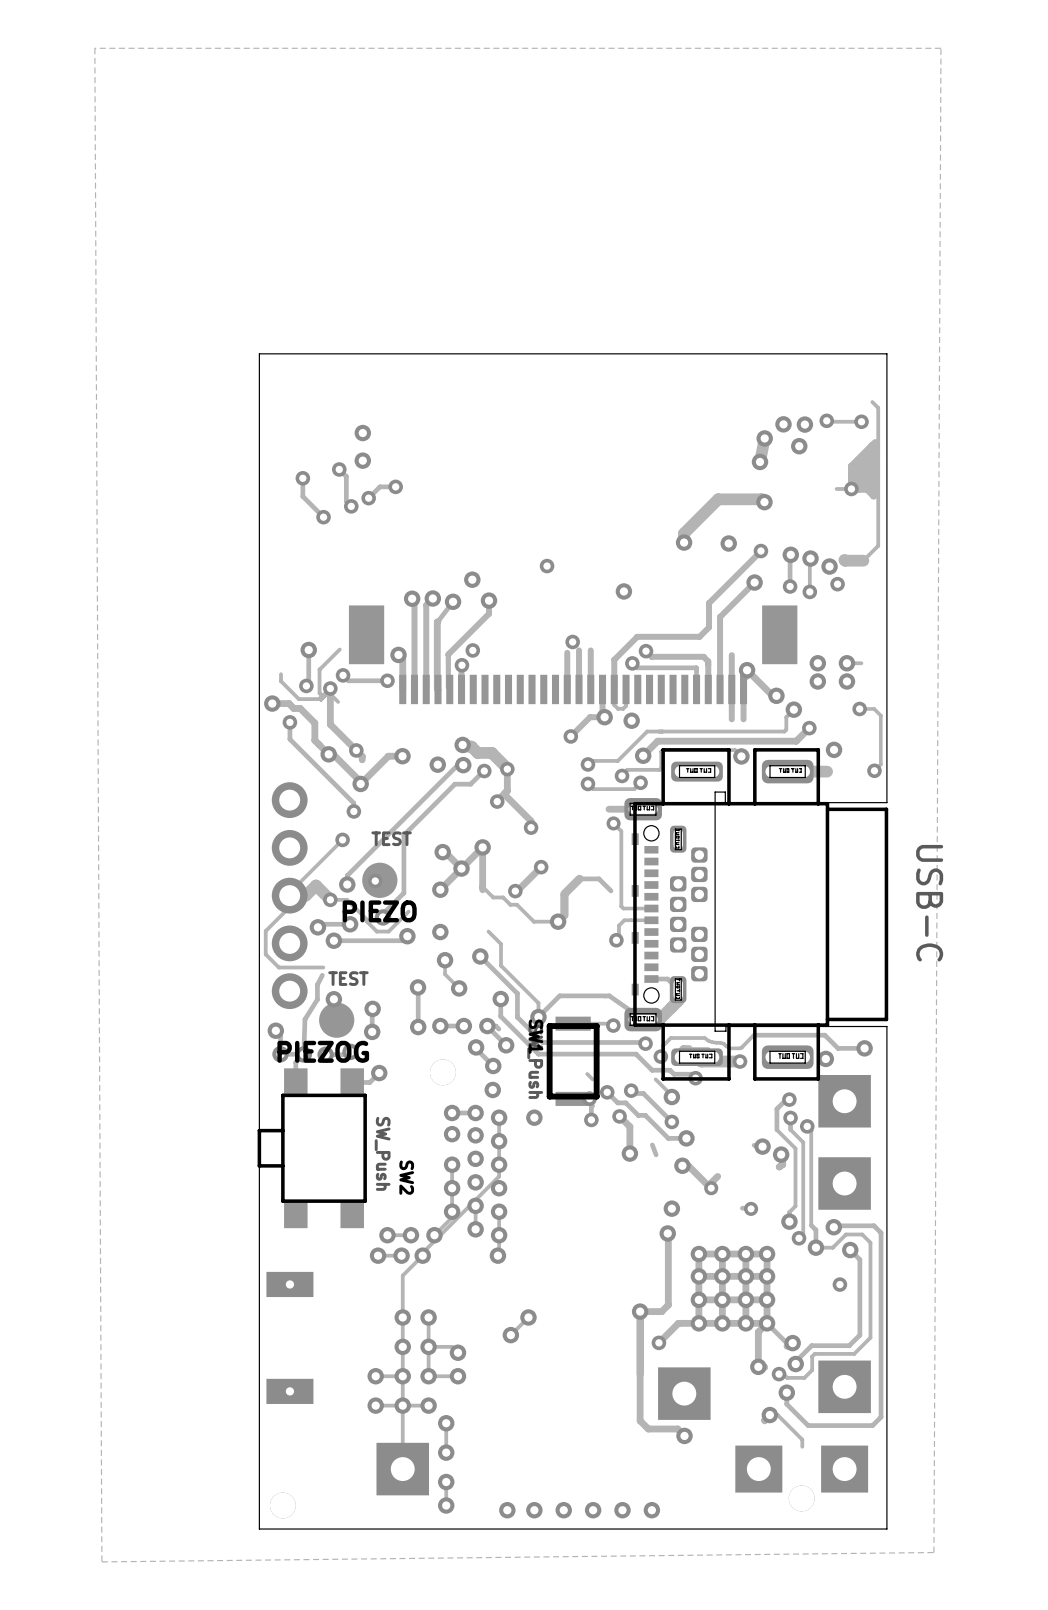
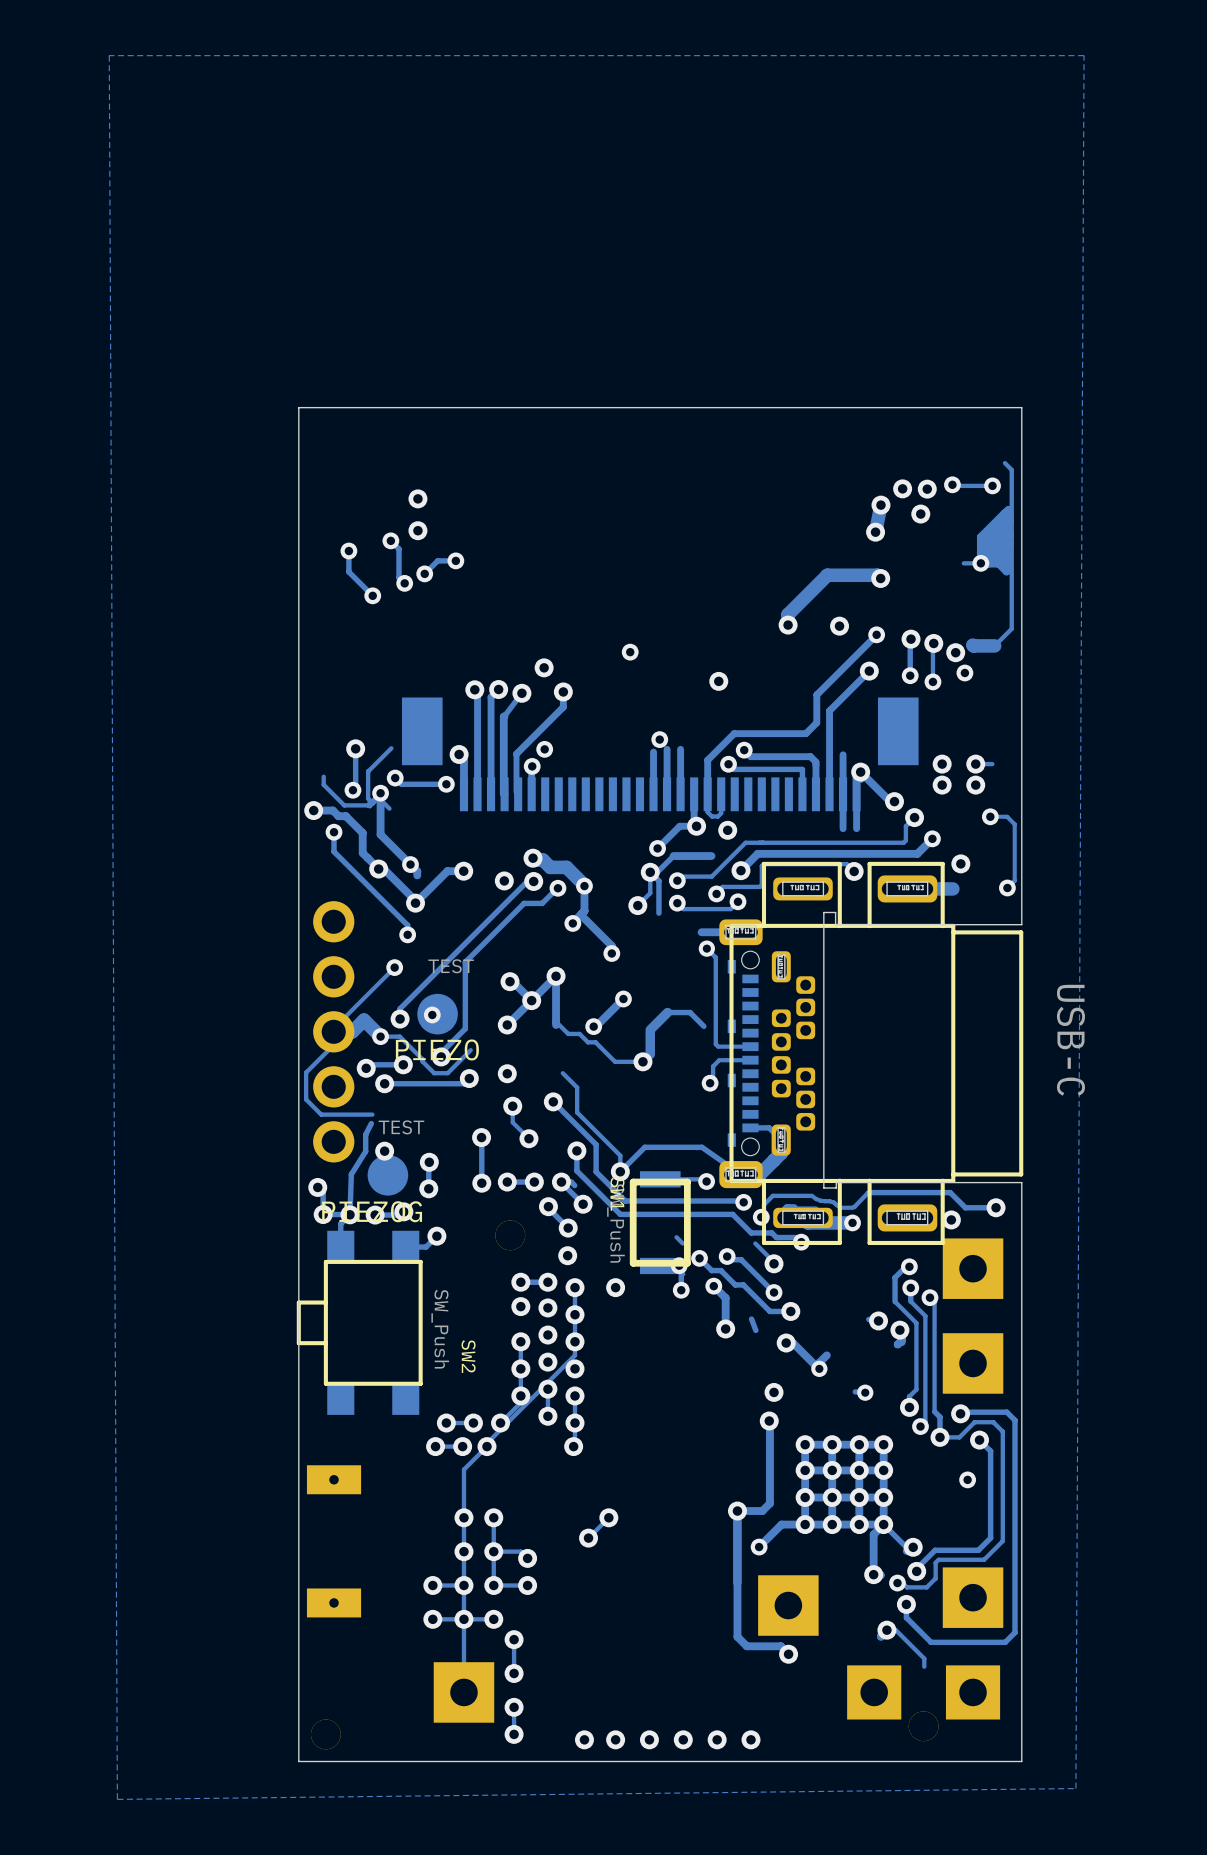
track: none -> (711, 856) (673, 856) (657, 872) (650, 872)
track: none -> (650, 872) (658, 880) (658, 913)
track: none -> (650, 872) (650, 893) (637, 905)
via: none -> (650, 872)
via: none -> (637, 905)

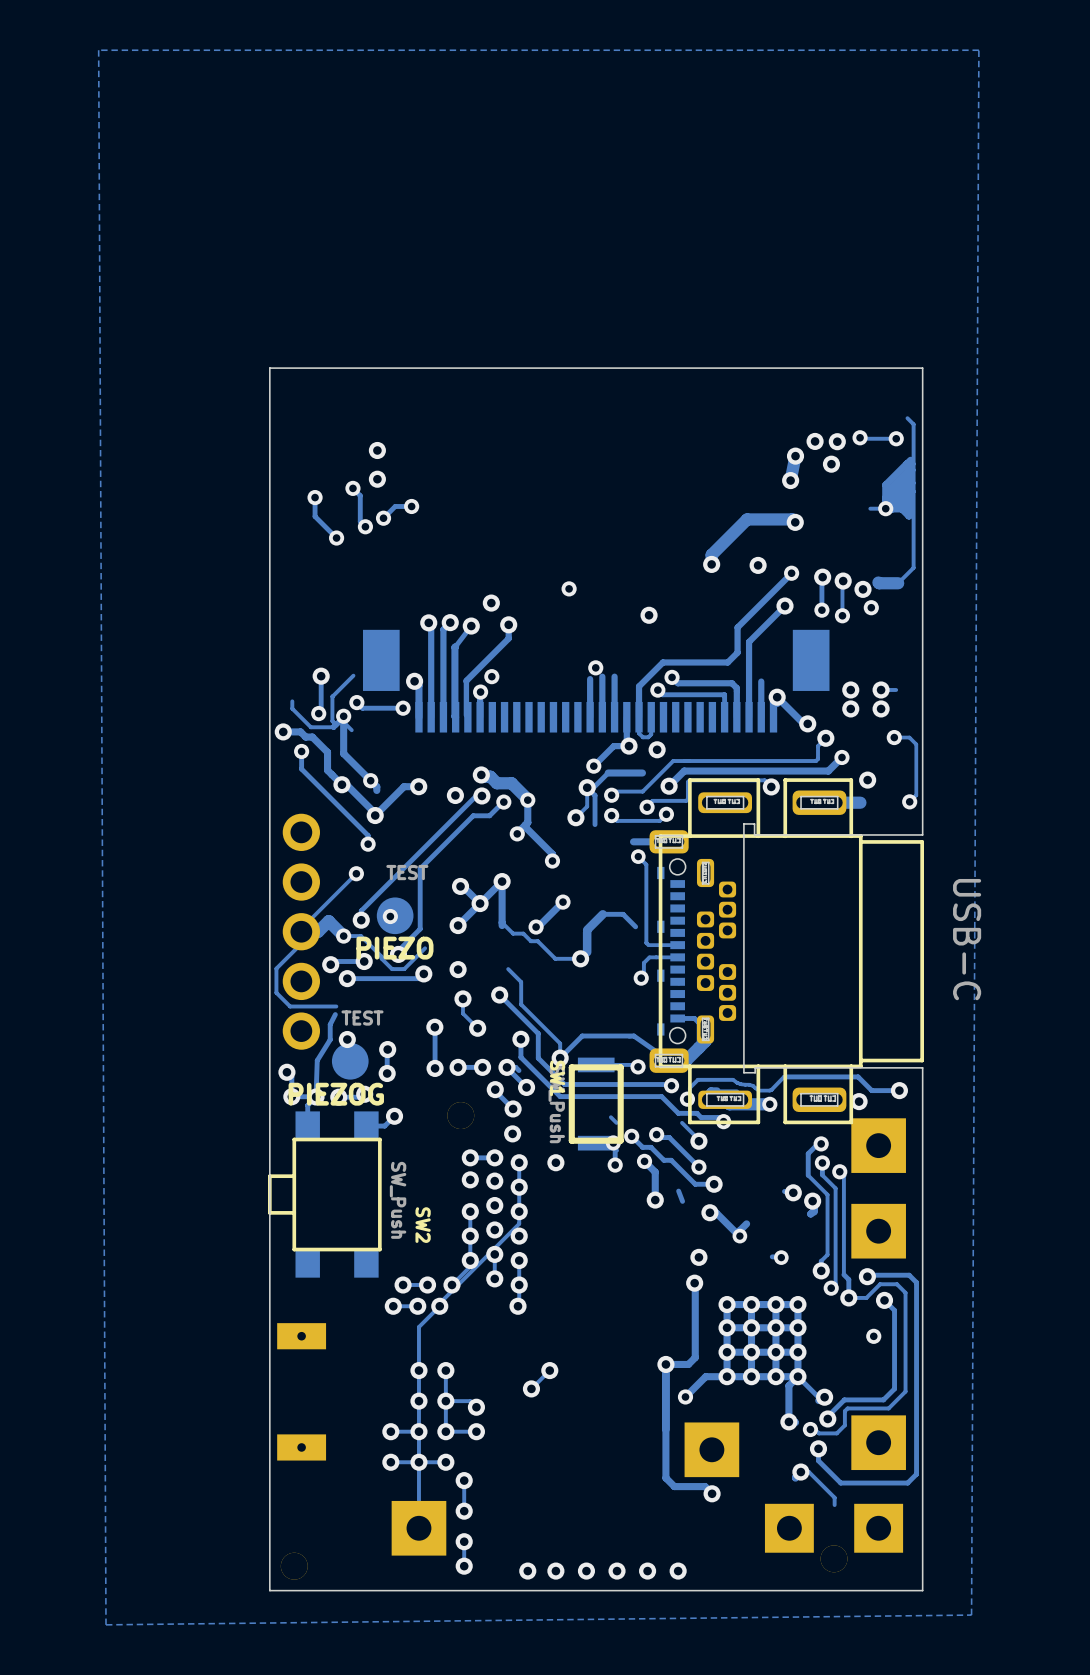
track: (843, 794) (843, 828) -> none
track: (856, 794) (856, 828) -> none

